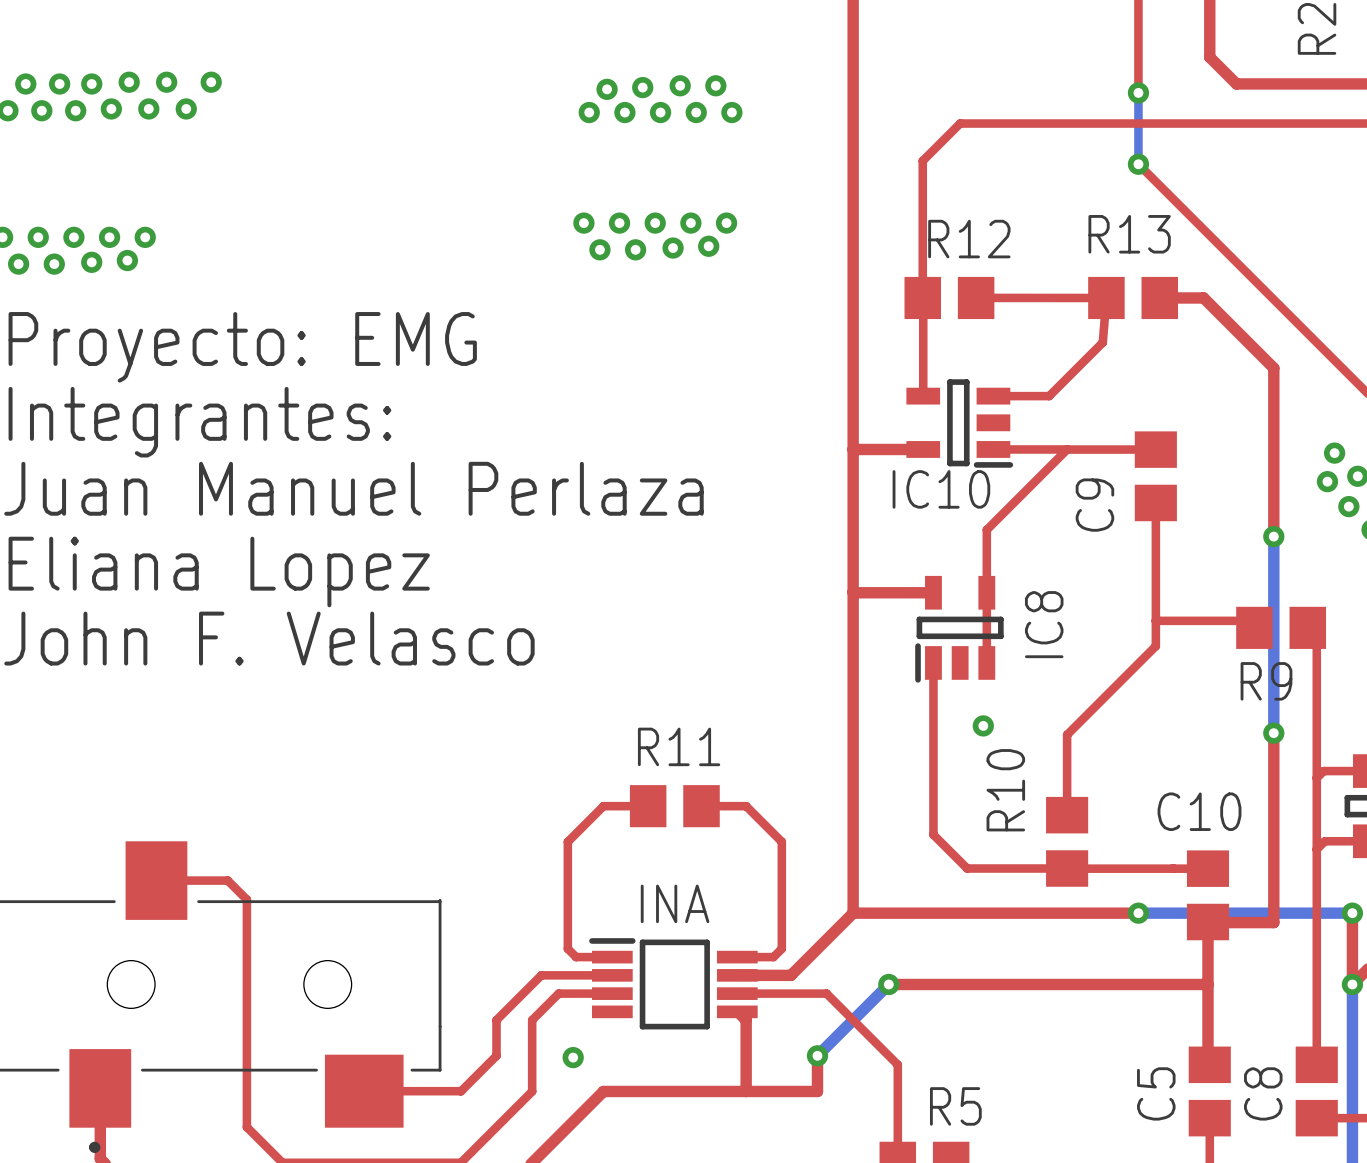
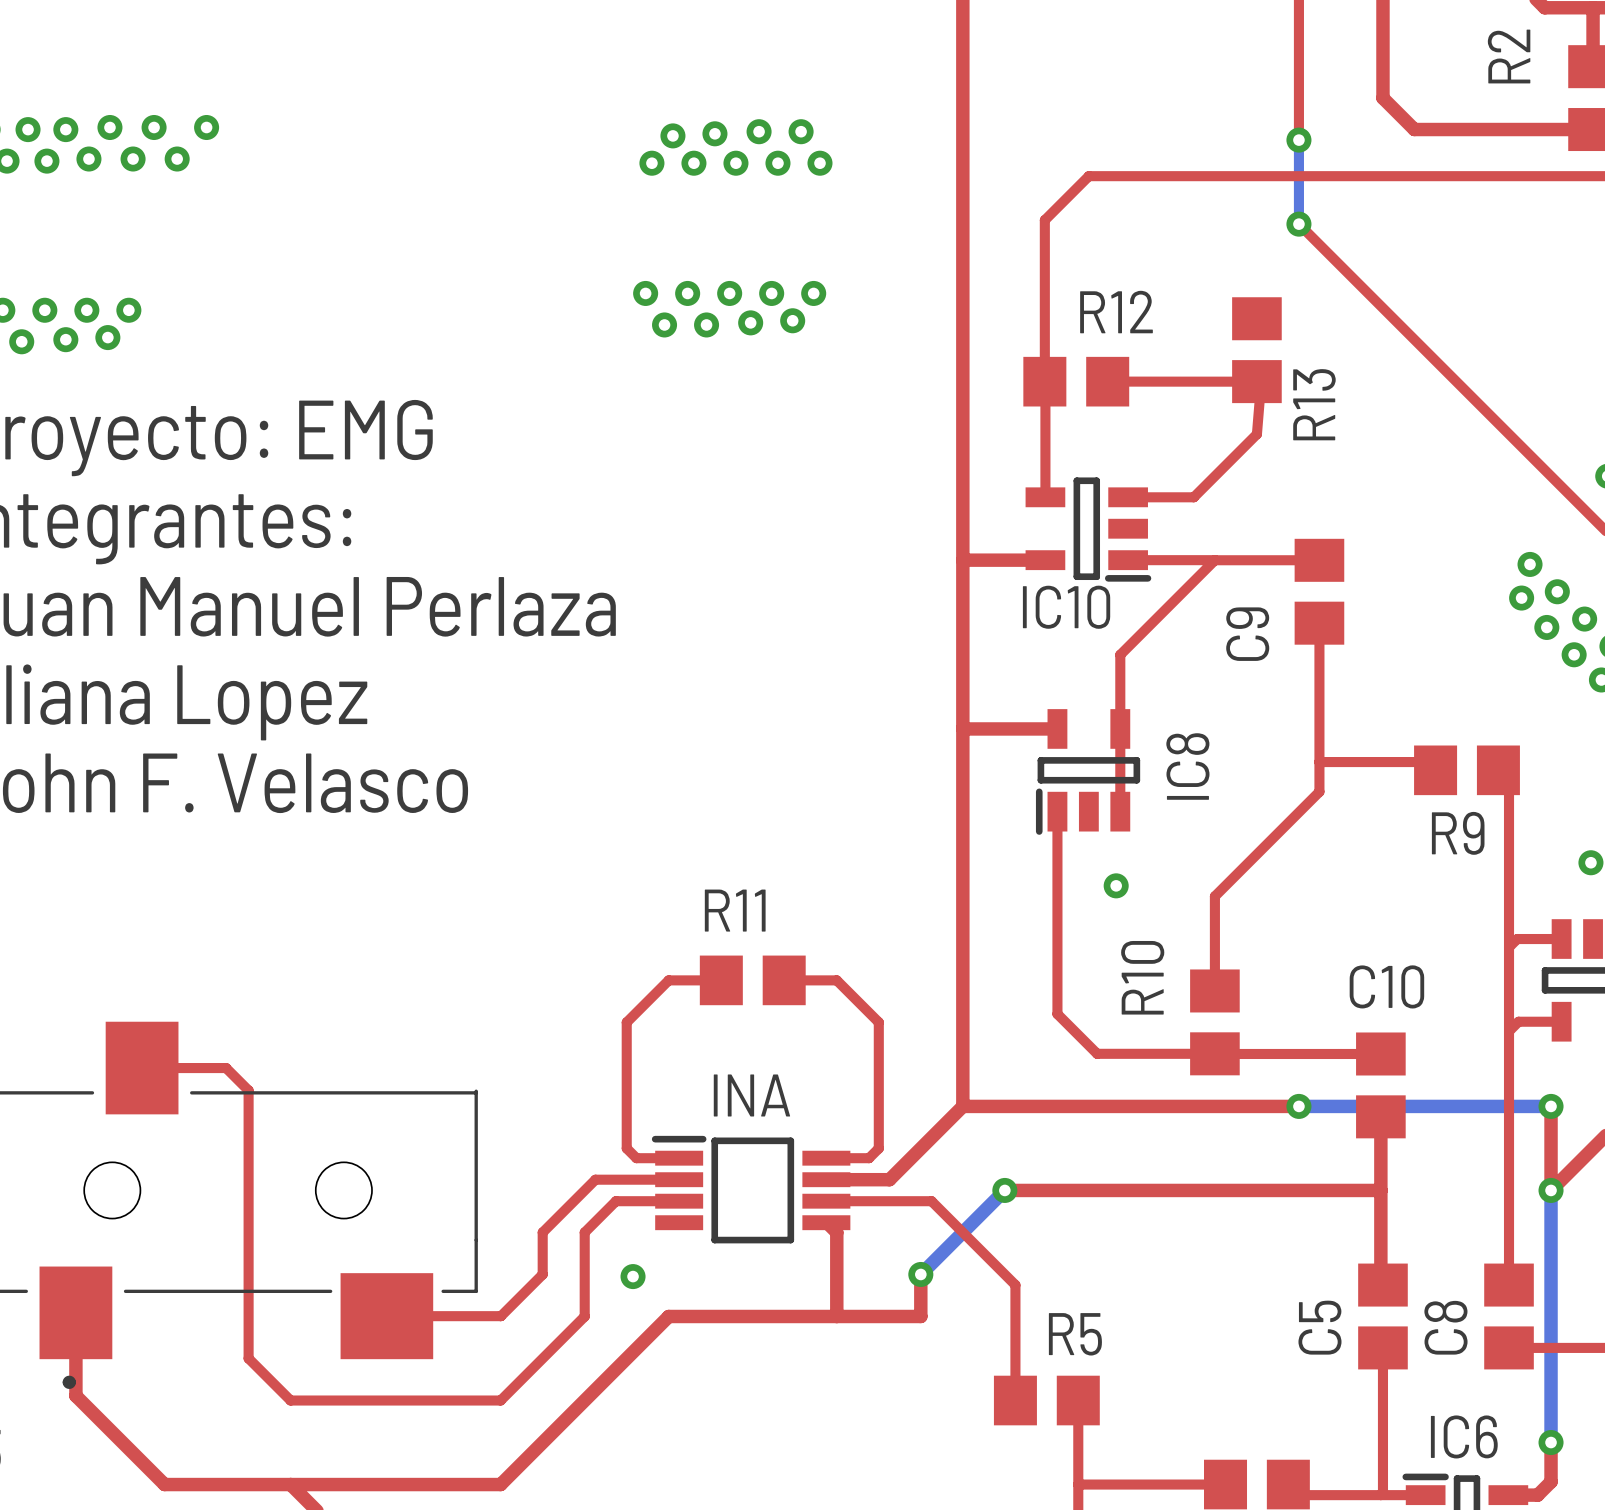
R13 rotation: 0° (1133, 297) -> 90° clockwise (1256, 350)
top track: (1159, 297) (1203, 297) (1273, 368) (1273, 536) -> none
bottom track: (1273, 536) (1273, 733) -> none
via: (1273, 536) -> none
top track: (1273, 733) (1273, 922) (1207, 922) -> none
via: (1273, 733) -> none

